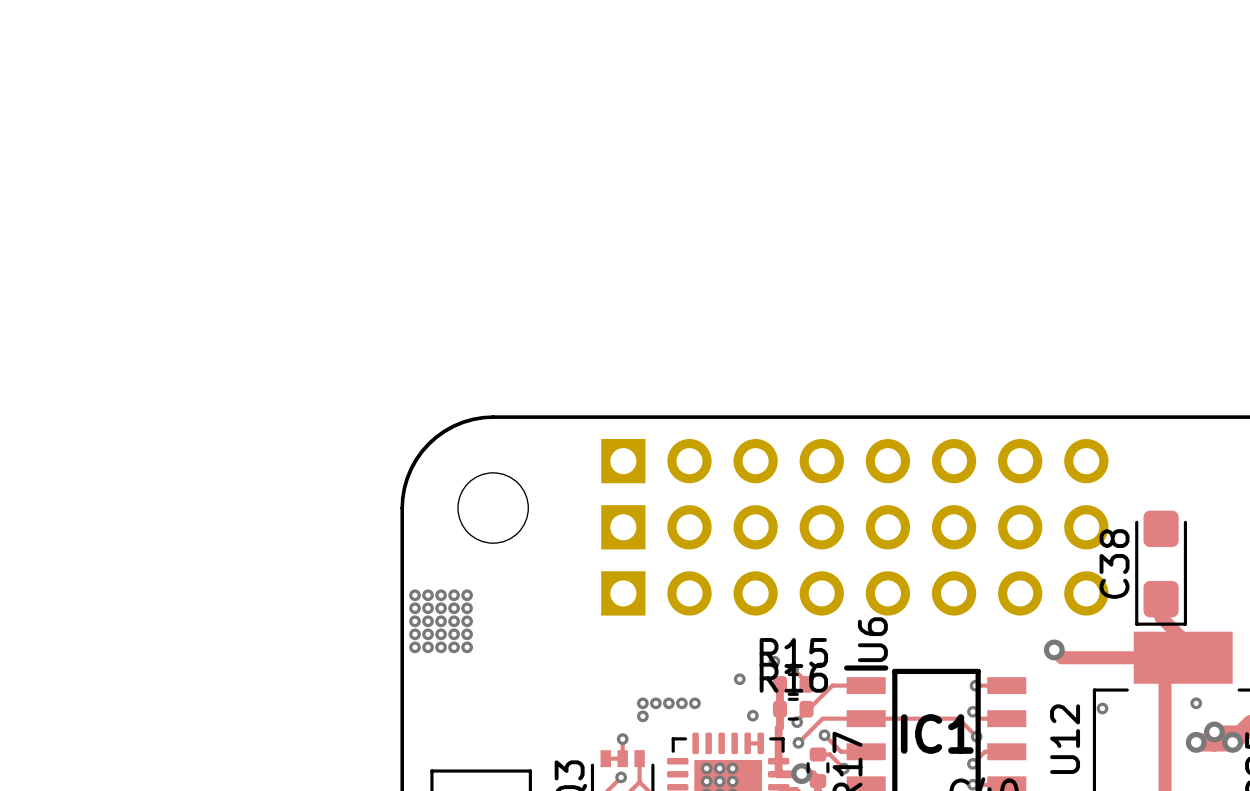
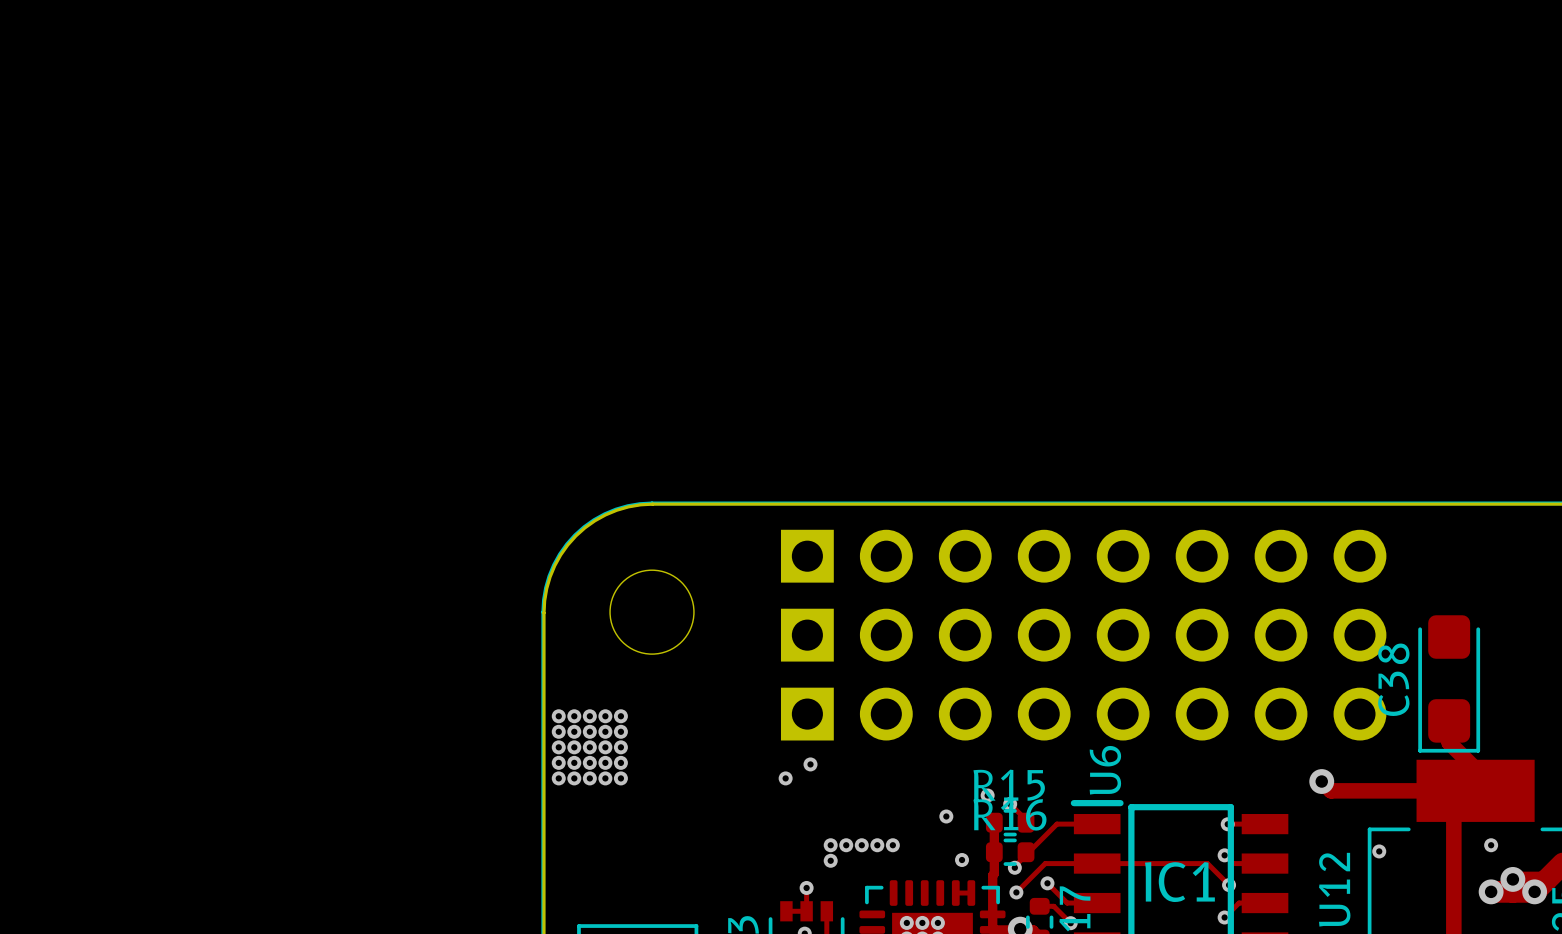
via: none -> (810, 764)
via: none -> (785, 778)

